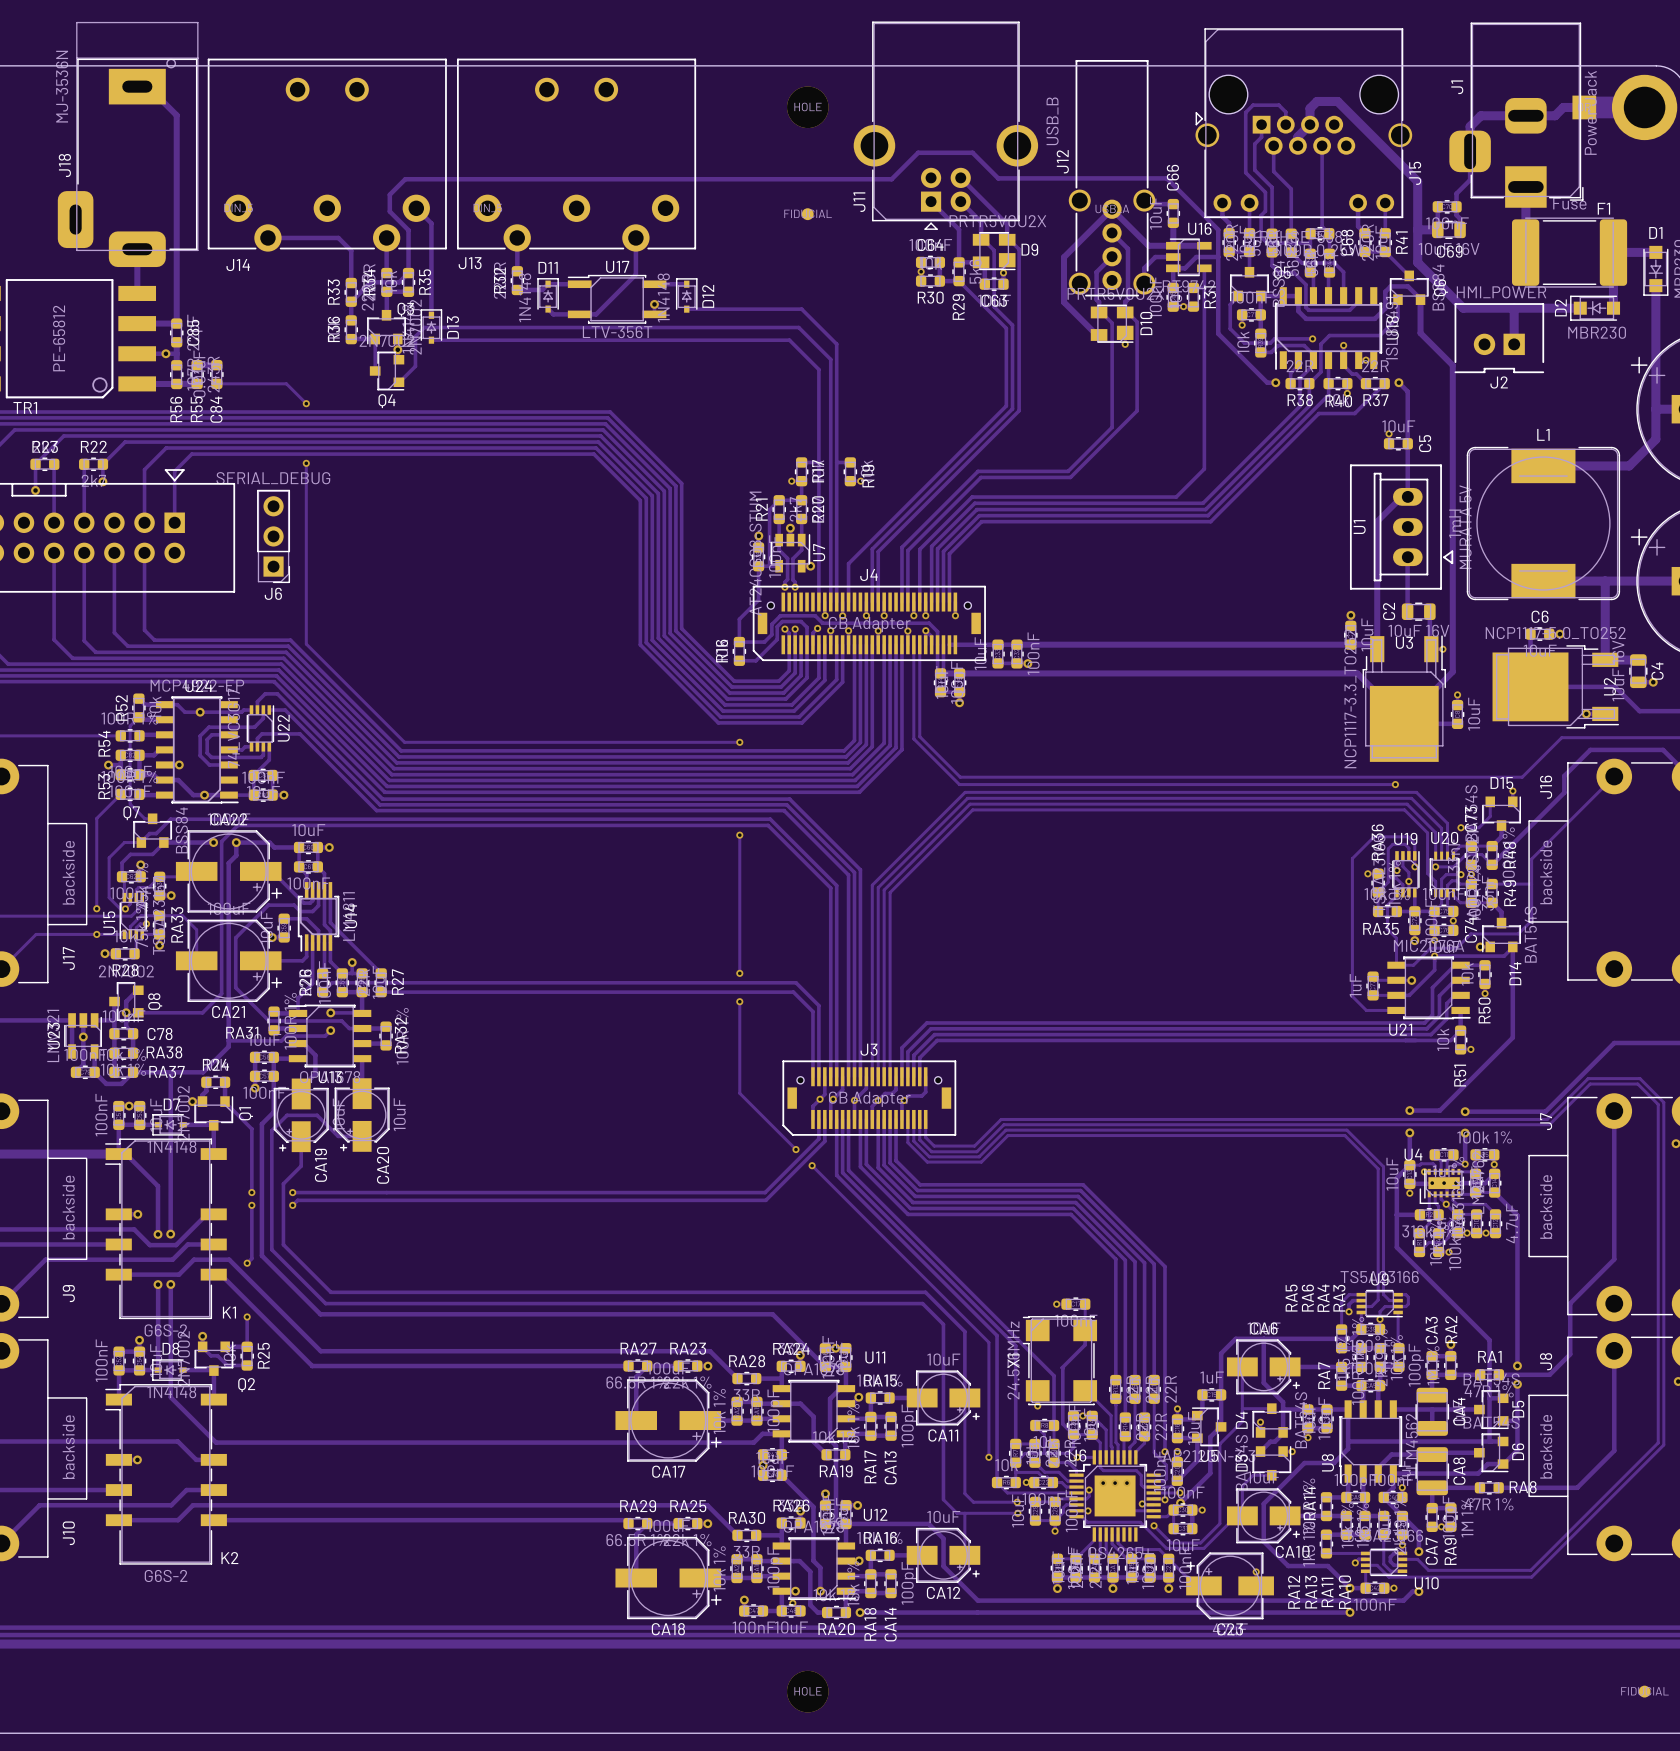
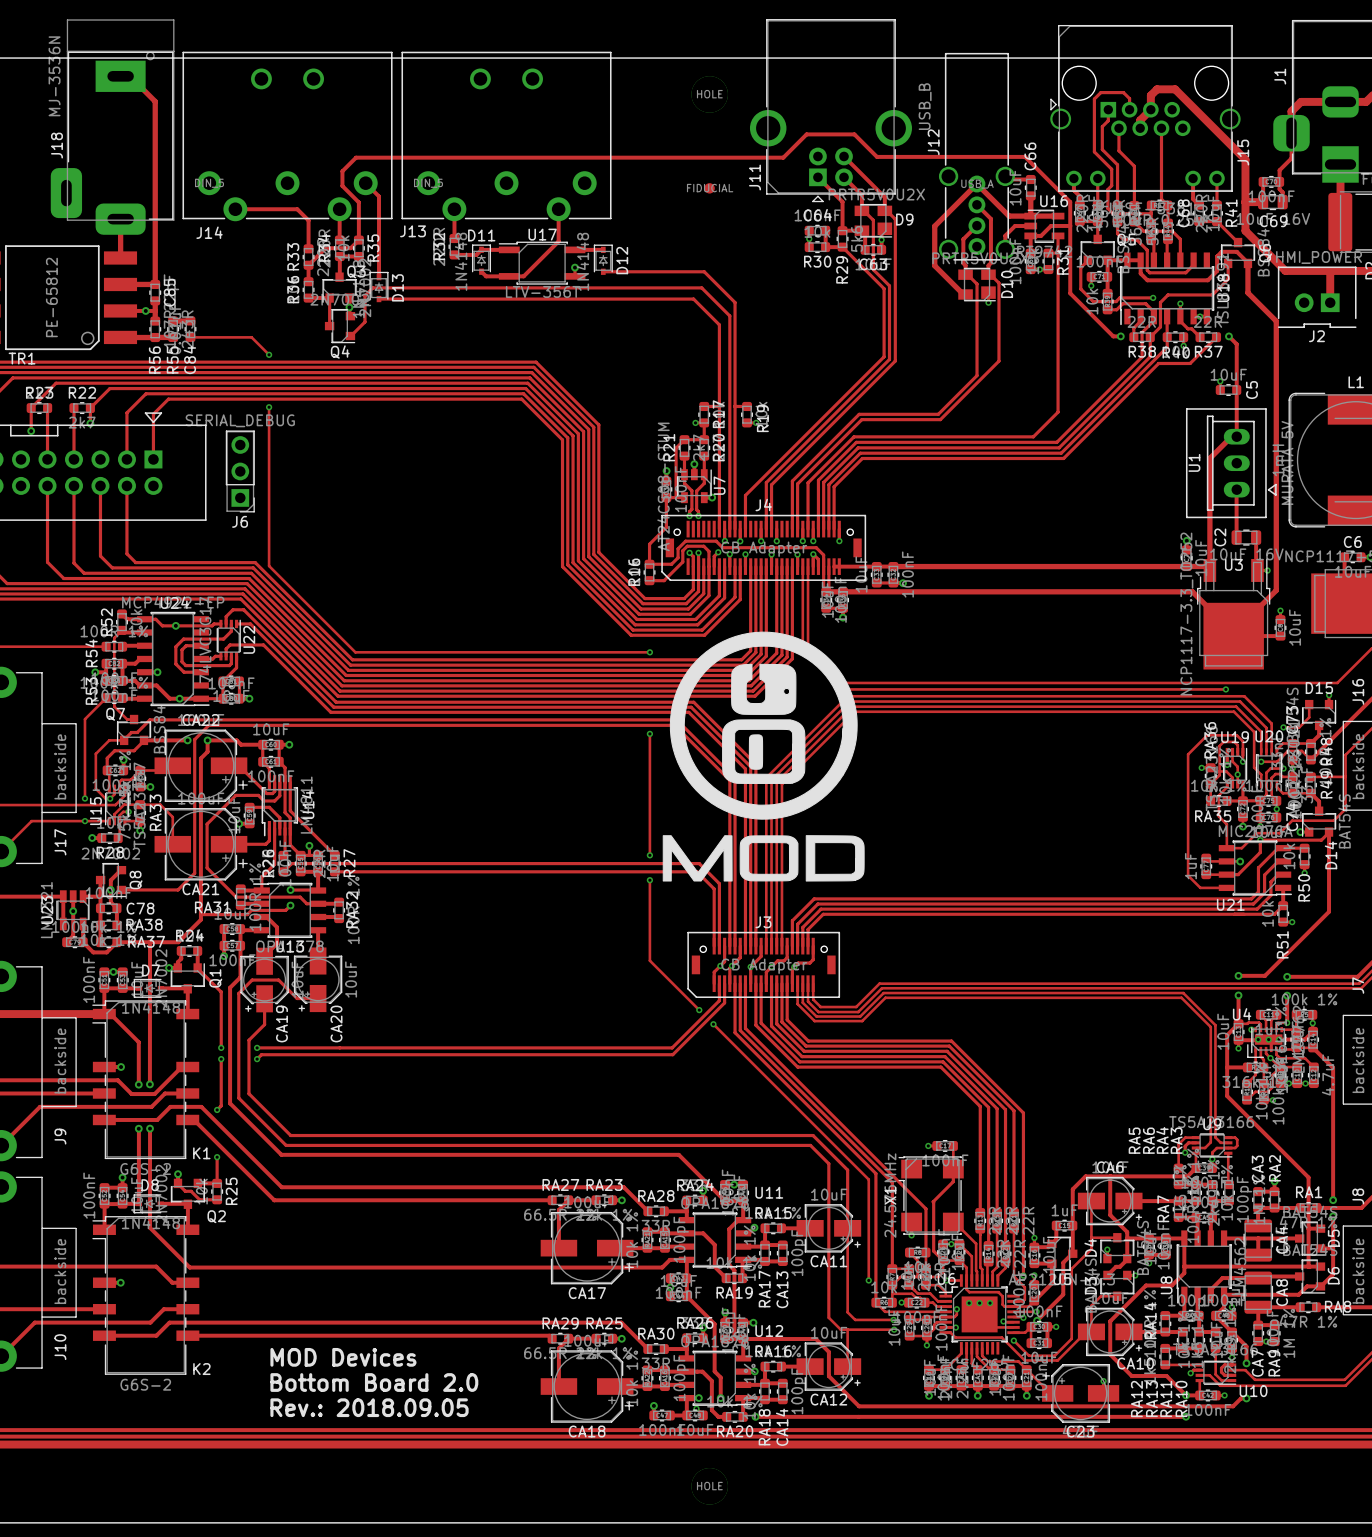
drawing: none -> [662, 631, 865, 882]
text: none -> MOD Devices (343, 1357)
text: none -> Bottom Board 2.0 (374, 1382)
text: none -> Rev.: 2018.09.05 (369, 1407)

